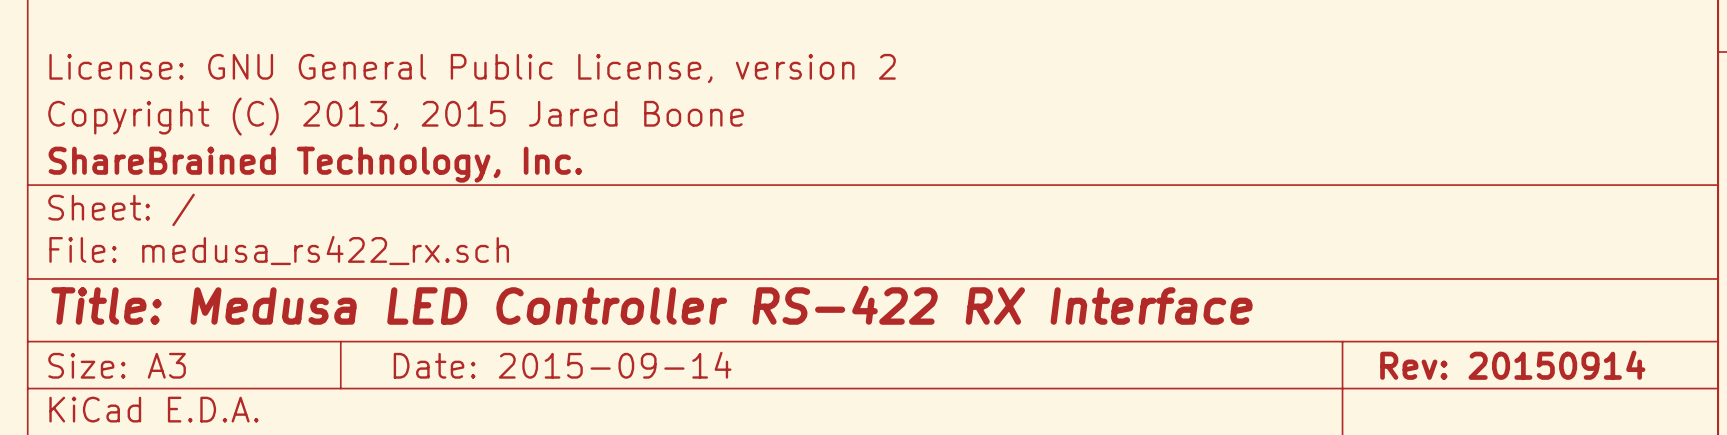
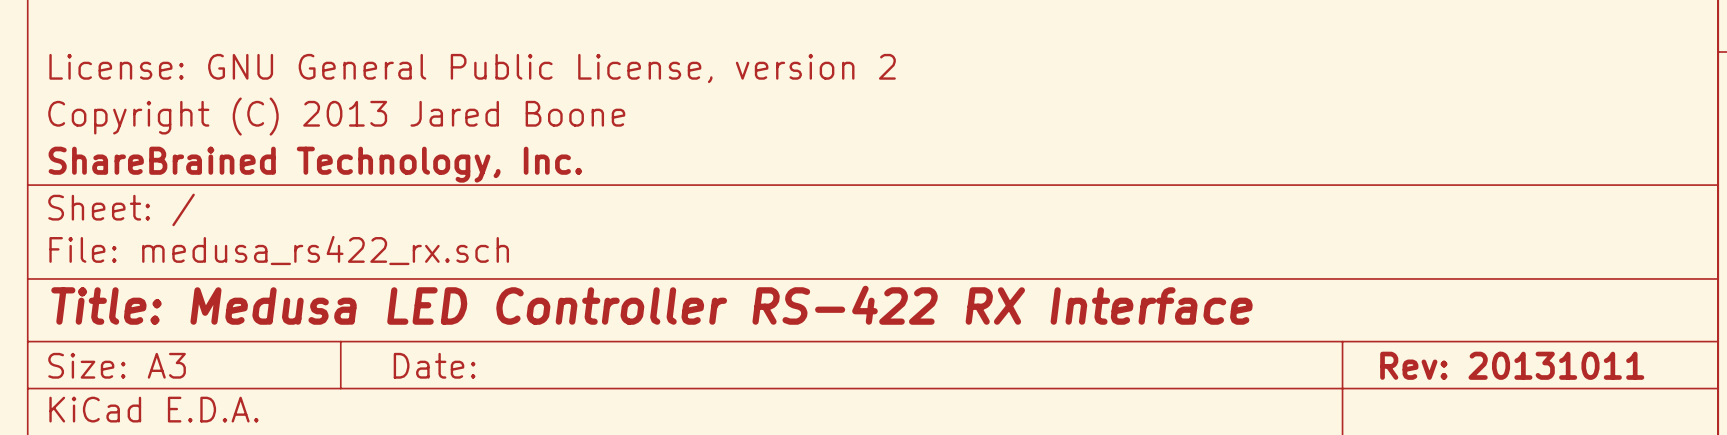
title block: Copyright (C) 2013, 2015 Jared Boone (396, 116) -> Copyright (C) 2013 Jared Boone (336, 116)
title block: Date: 2015-09-14 (562, 365) -> Date: (434, 365)
title block: Rev: 20150914 (1512, 365) -> Rev: 20131011 (1512, 365)

